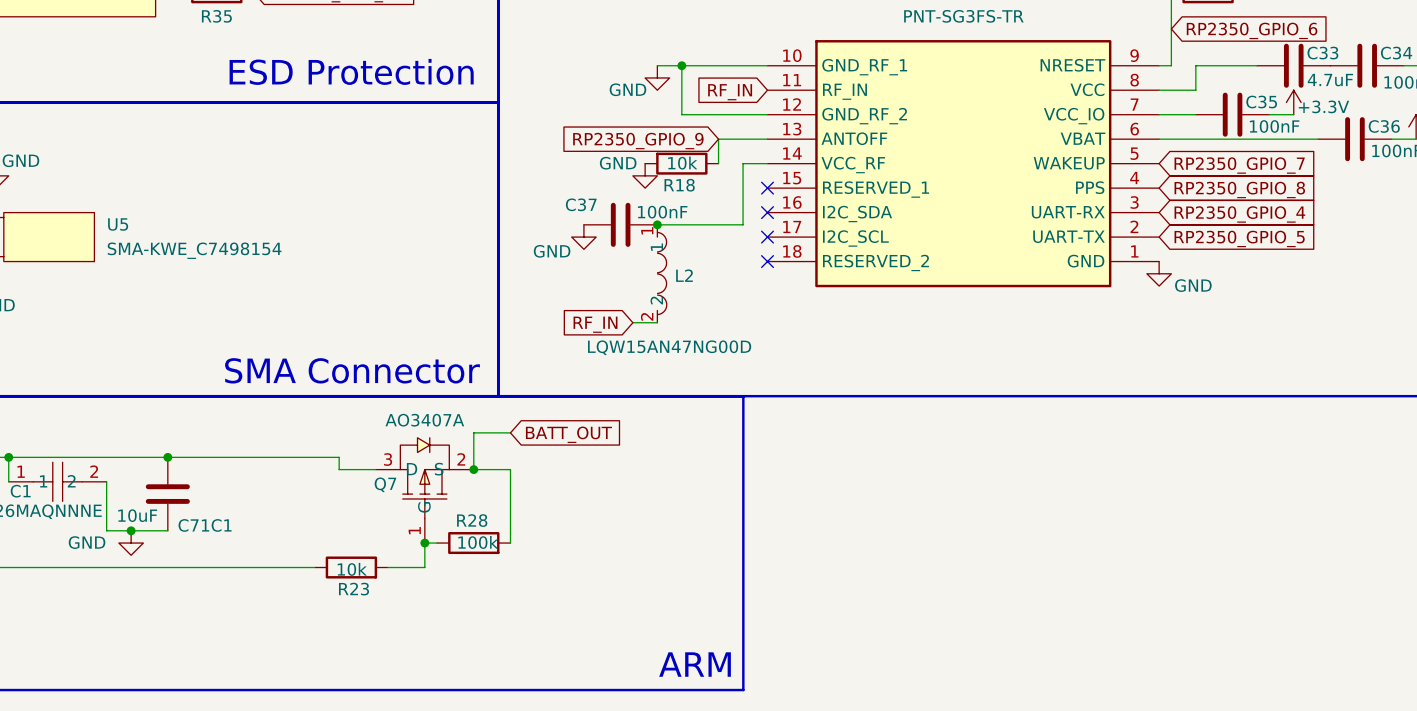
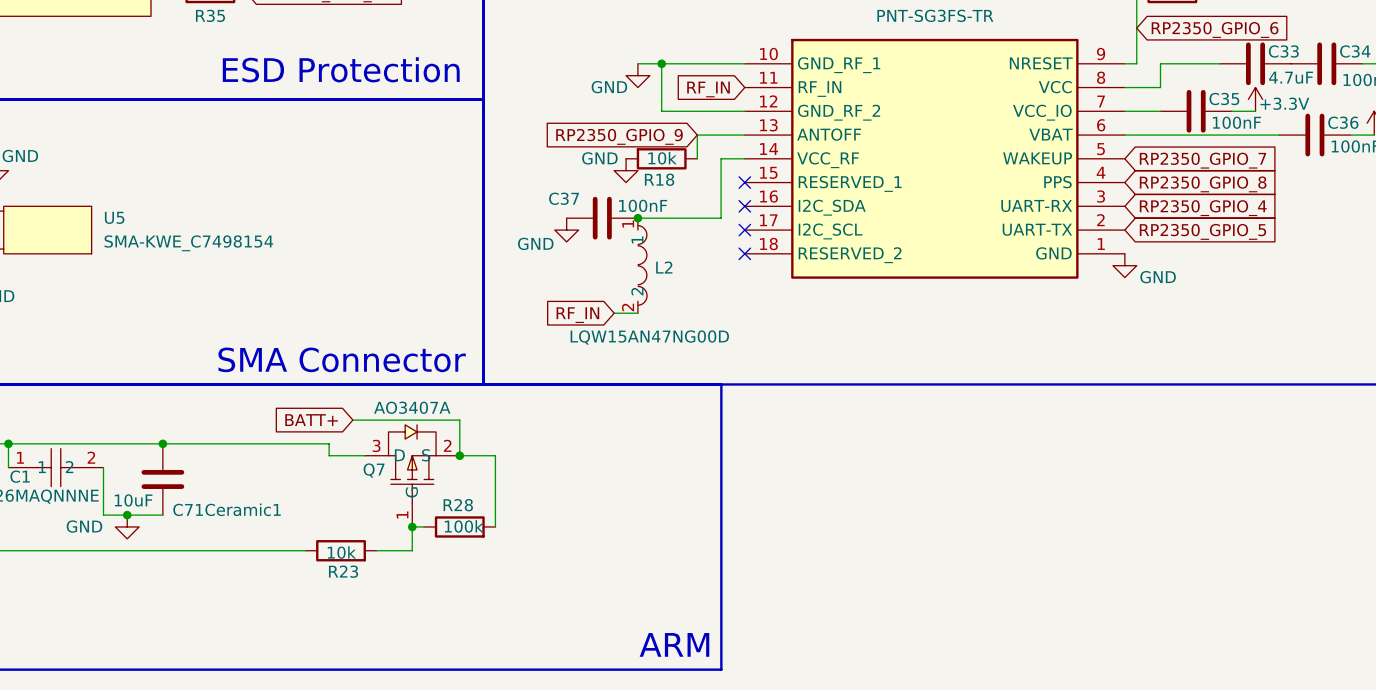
global label: none -> BATT+ (311, 420)
wire: (473, 432) (510, 432) -> (459, 420) (352, 420)
global label: BATT_OUT (568, 434) -> none
C71C1 name: C71C1 (205, 525) -> C71Ceramic1 (227, 509)

